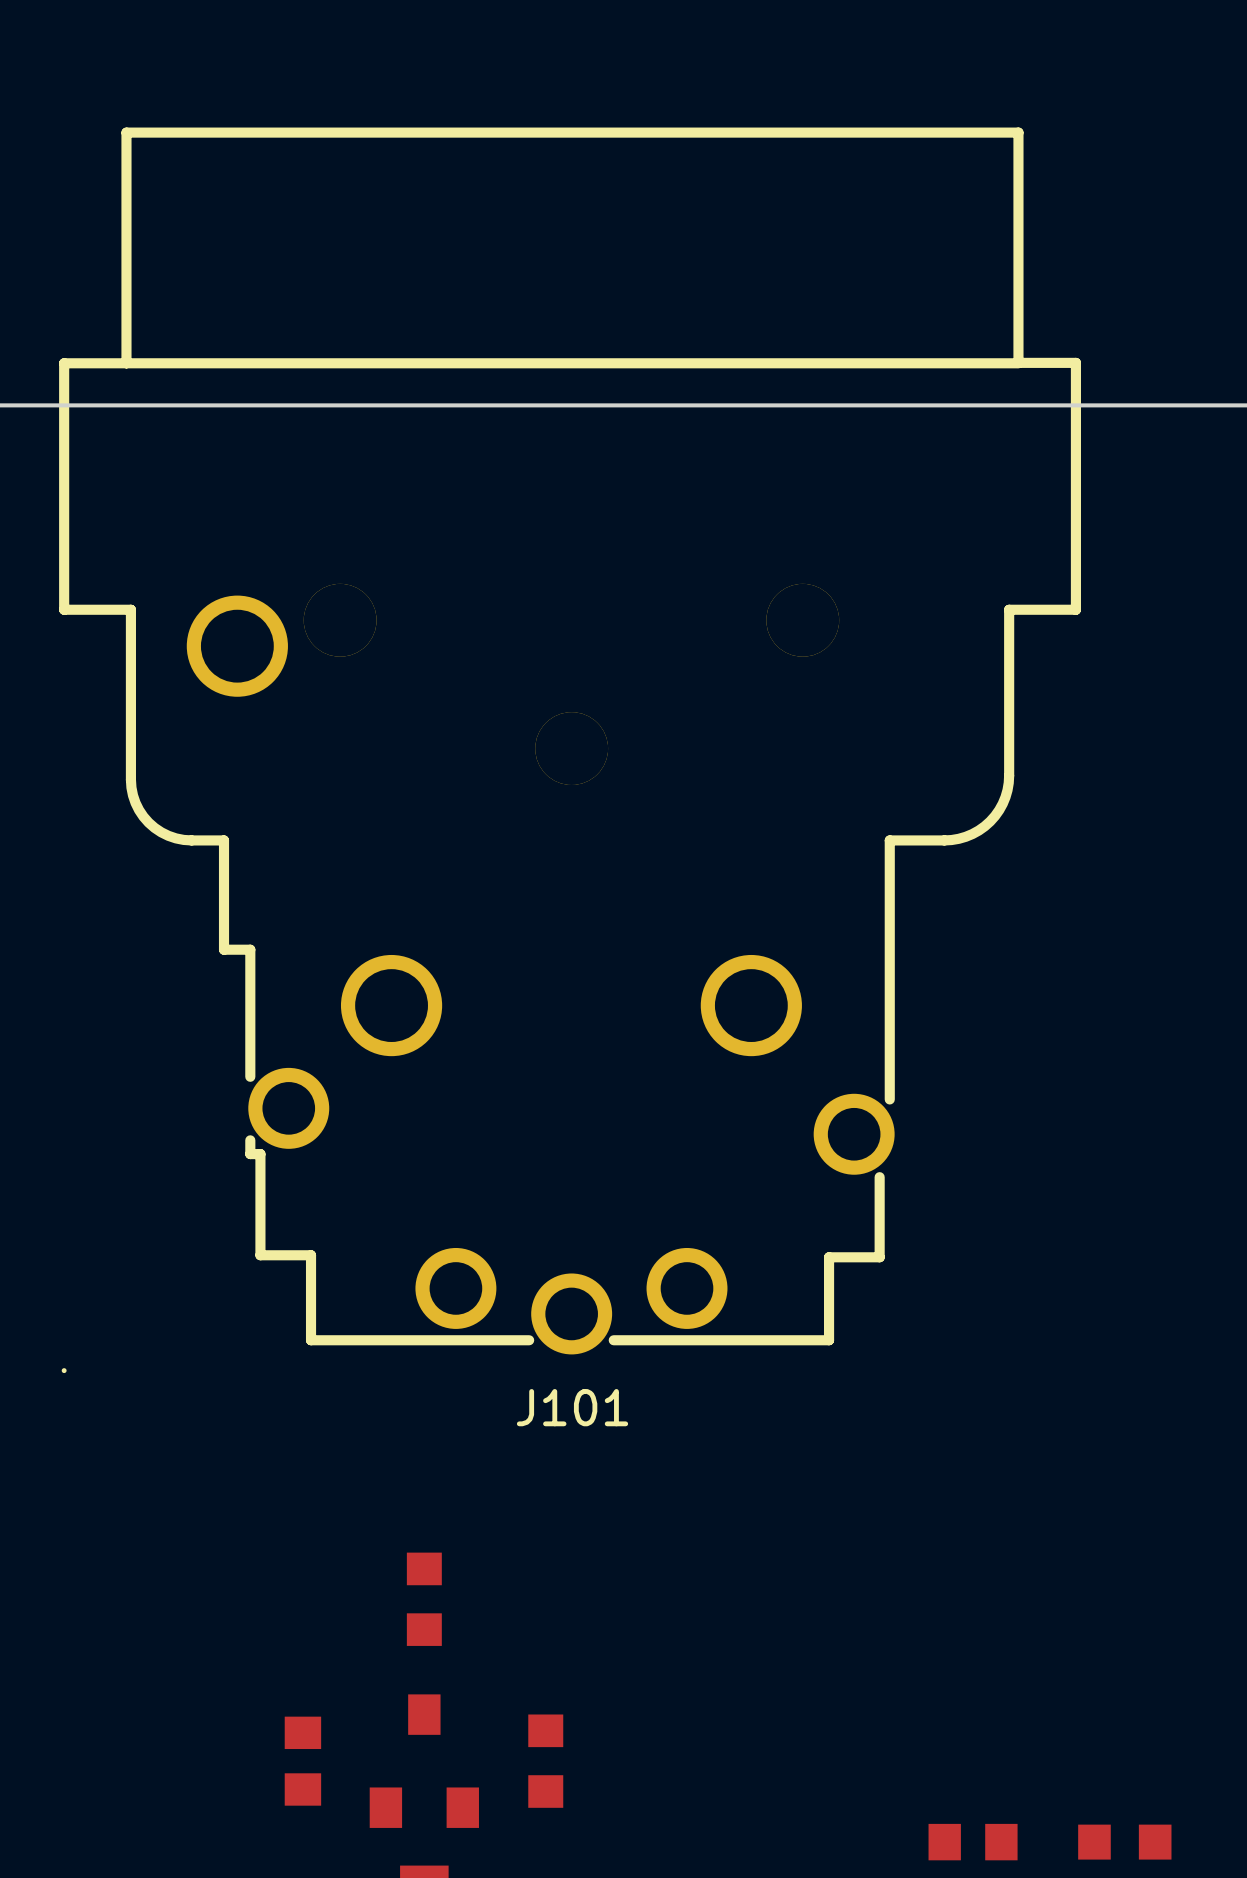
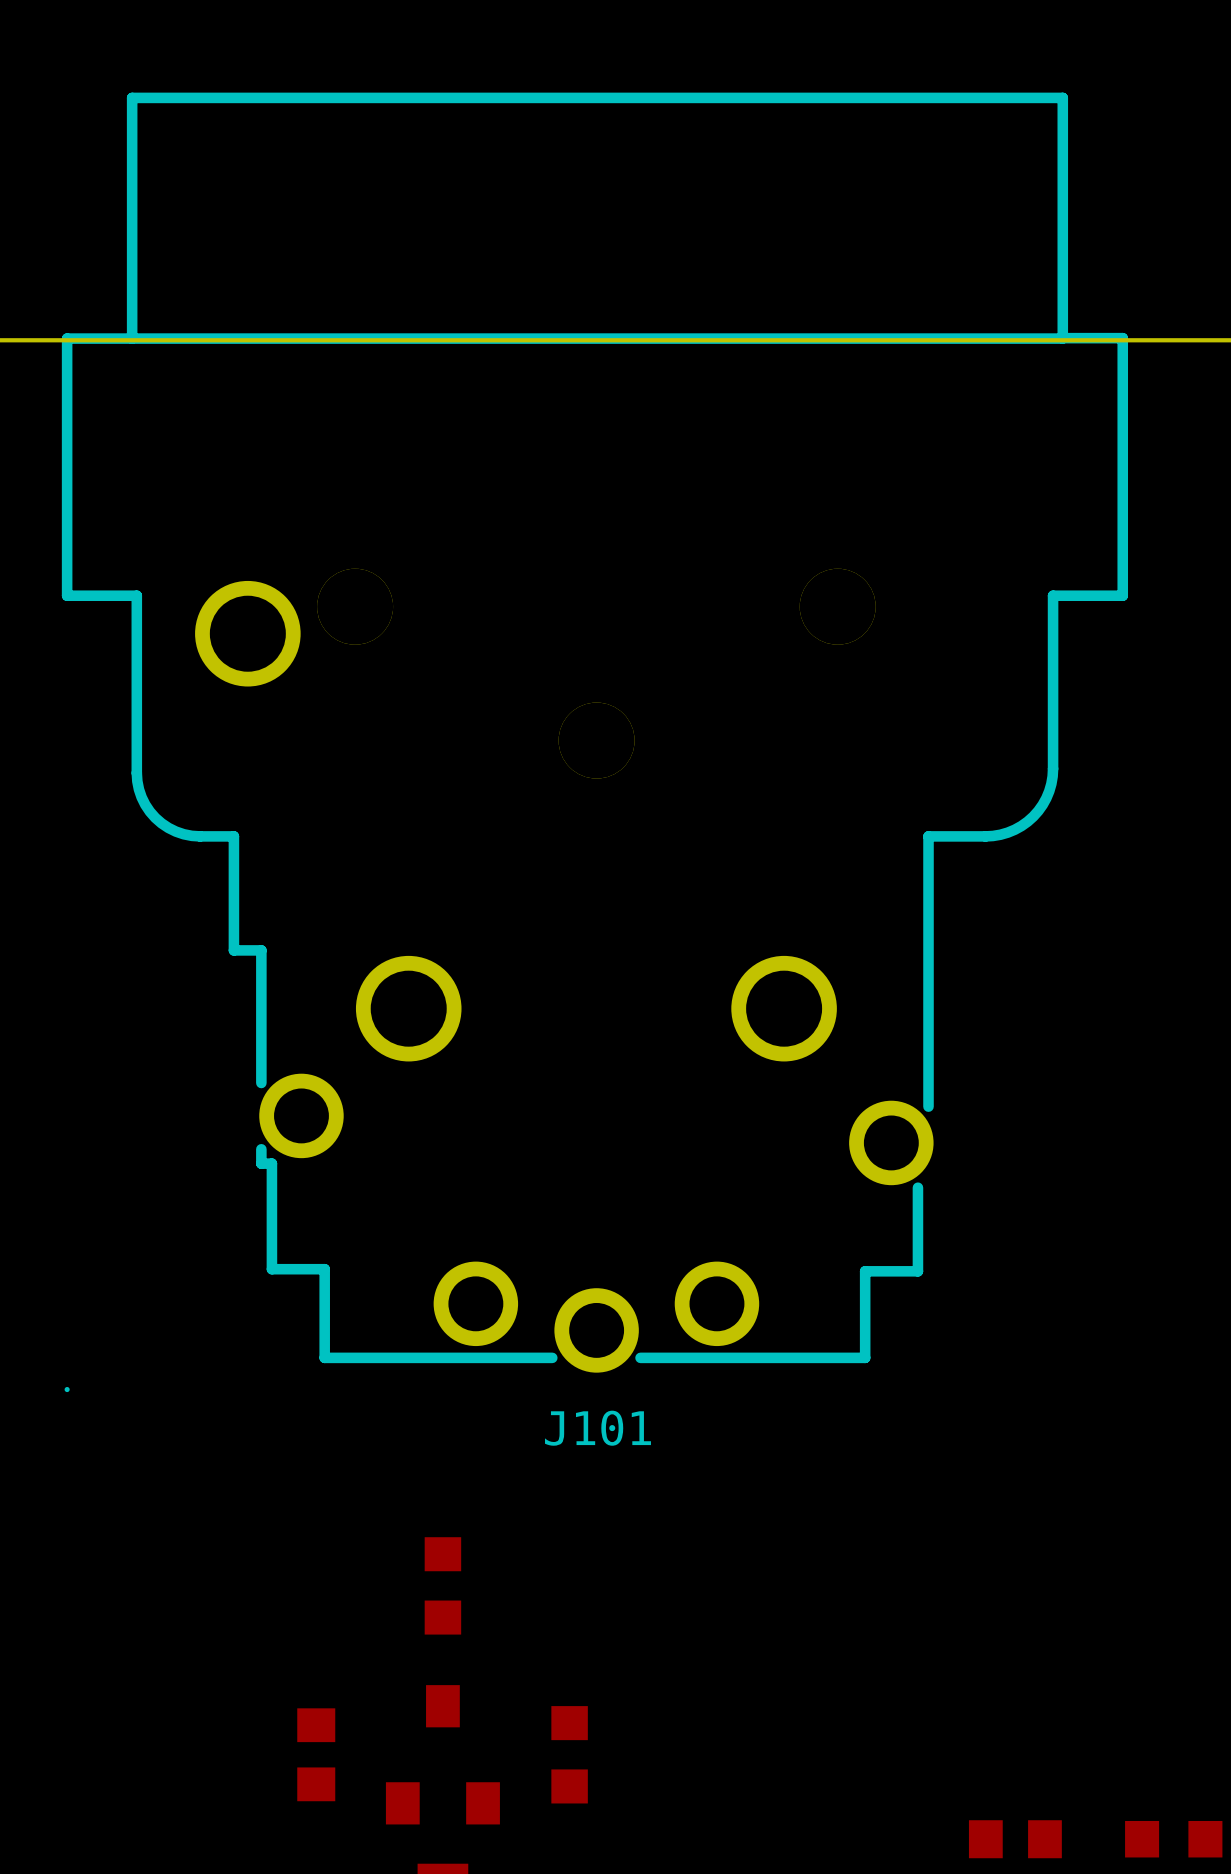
J101 position: (570, 750) -> (594, 742)

